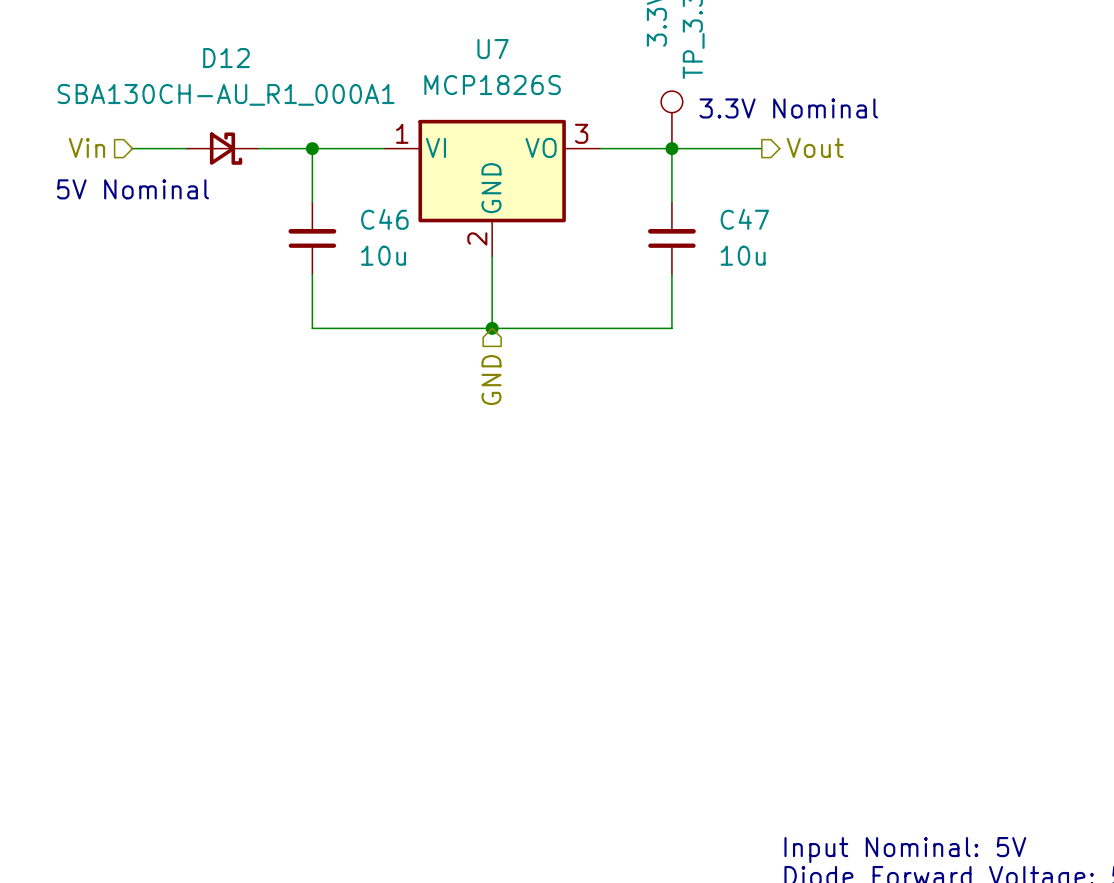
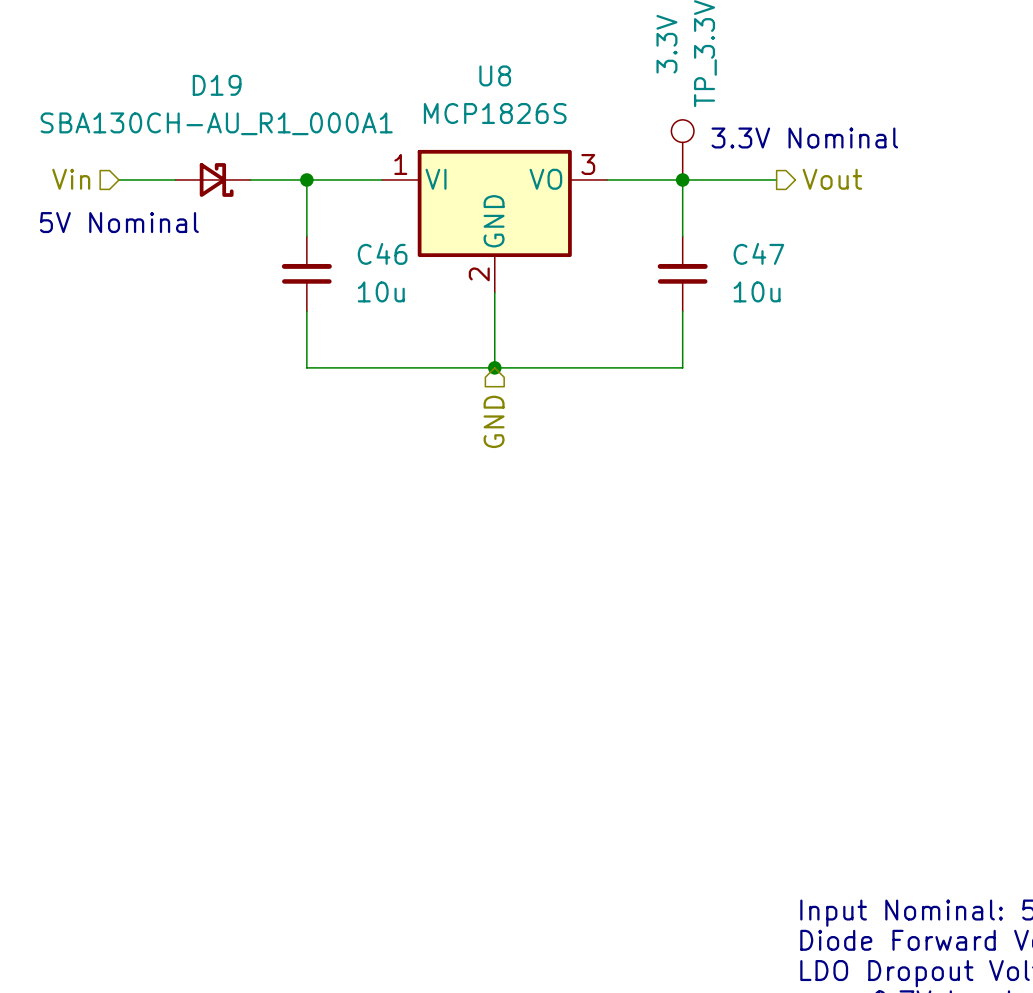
U7 name: U7 (493, 49) -> U8 (495, 75)
D12 name: D12 (226, 58) -> D19 (217, 85)

